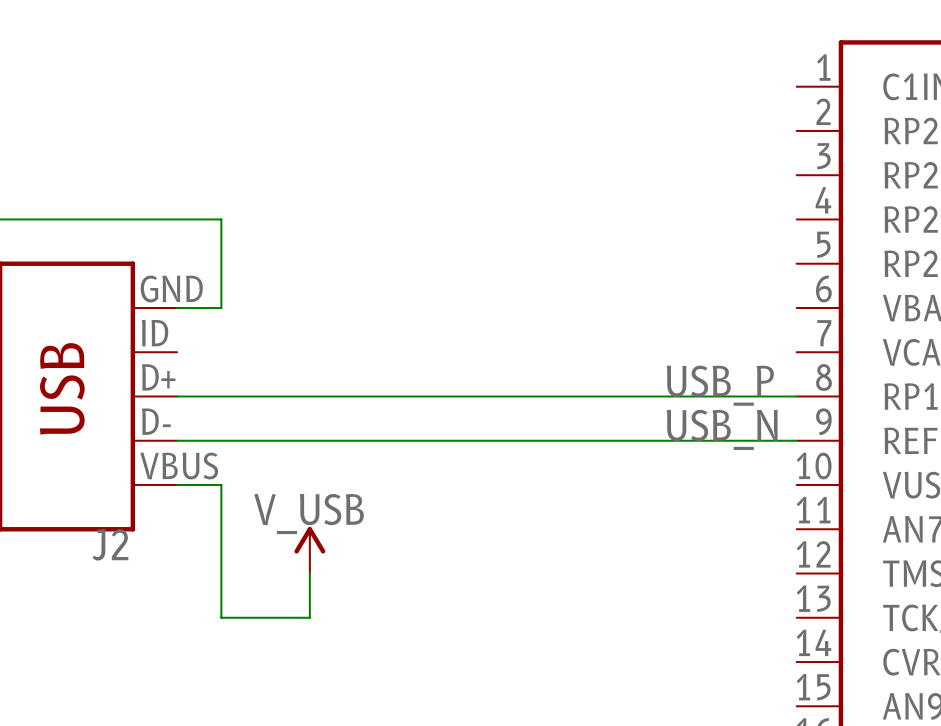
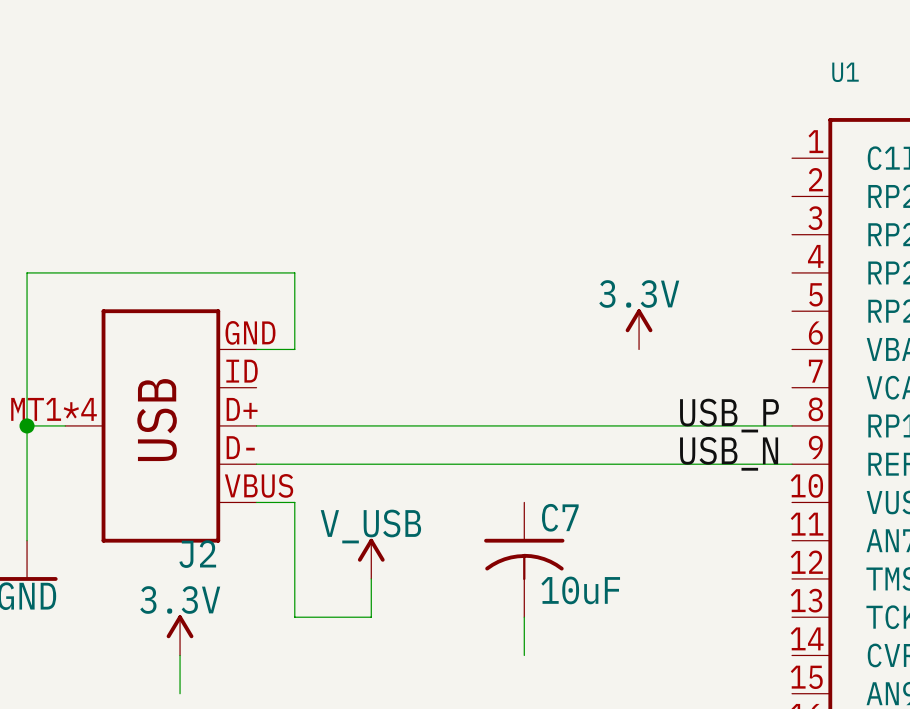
power symbol: none -> 3.3V (639, 329)
C7: none -> 10uF (524, 559)
wire: none -> (524, 617) (524, 655)
power symbol: none -> 3.3V (180, 635)
wire: none -> (180, 655) (180, 693)

